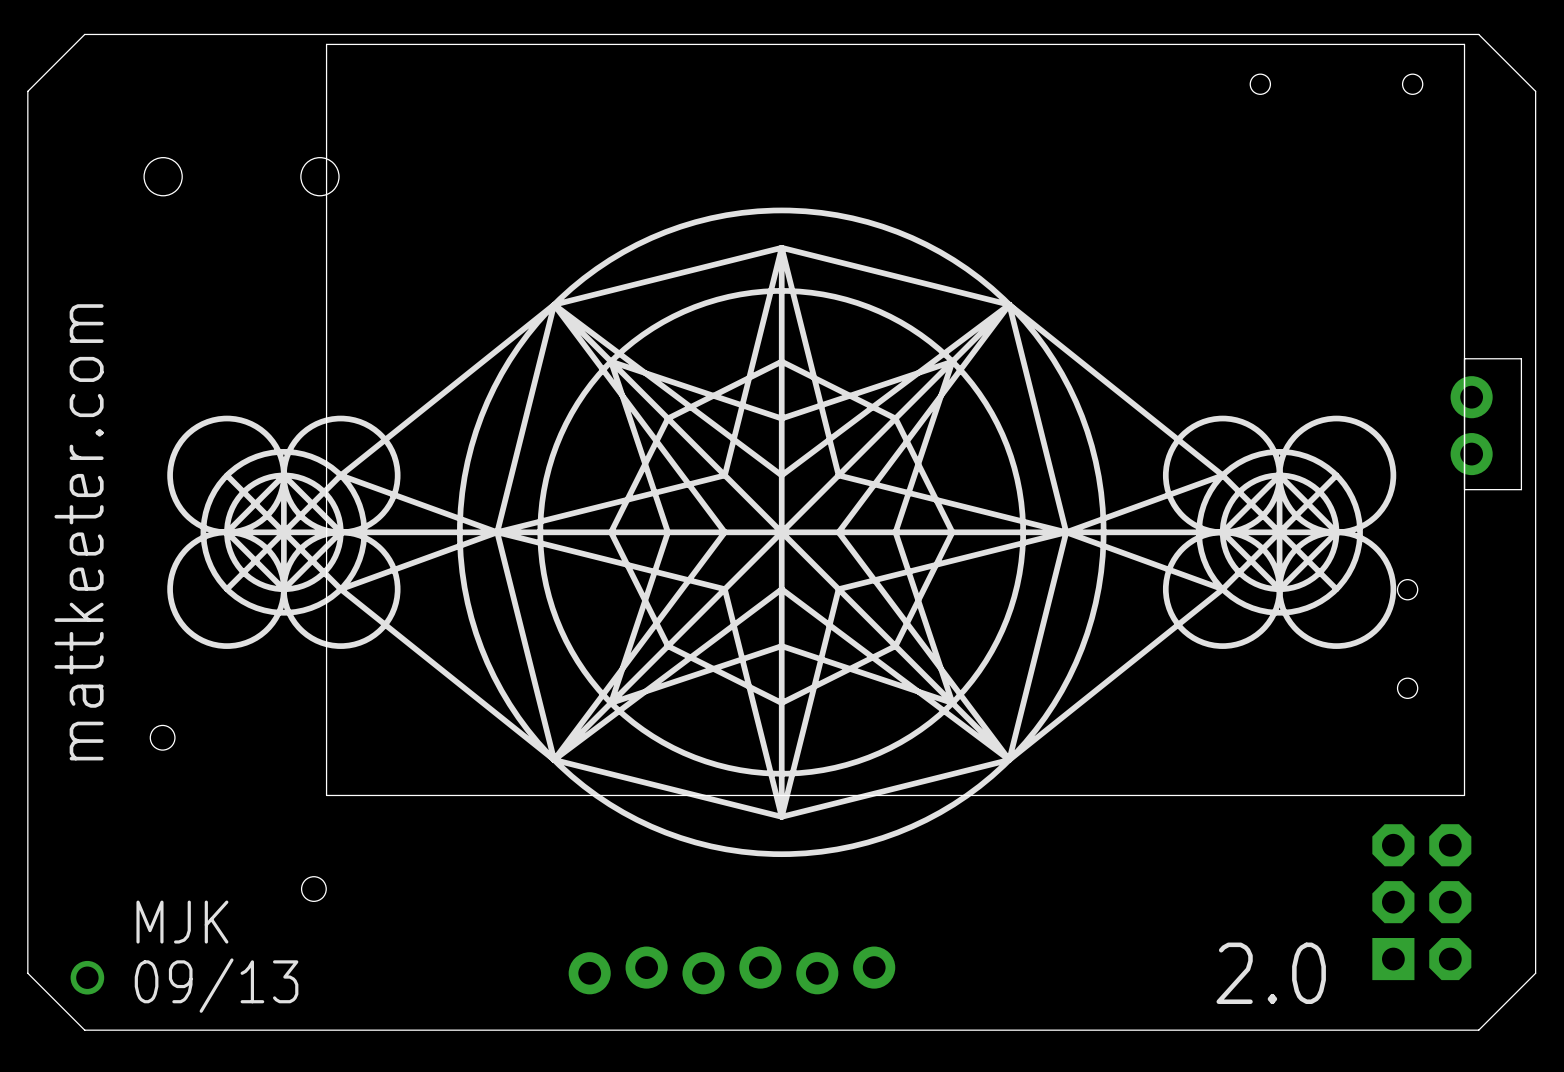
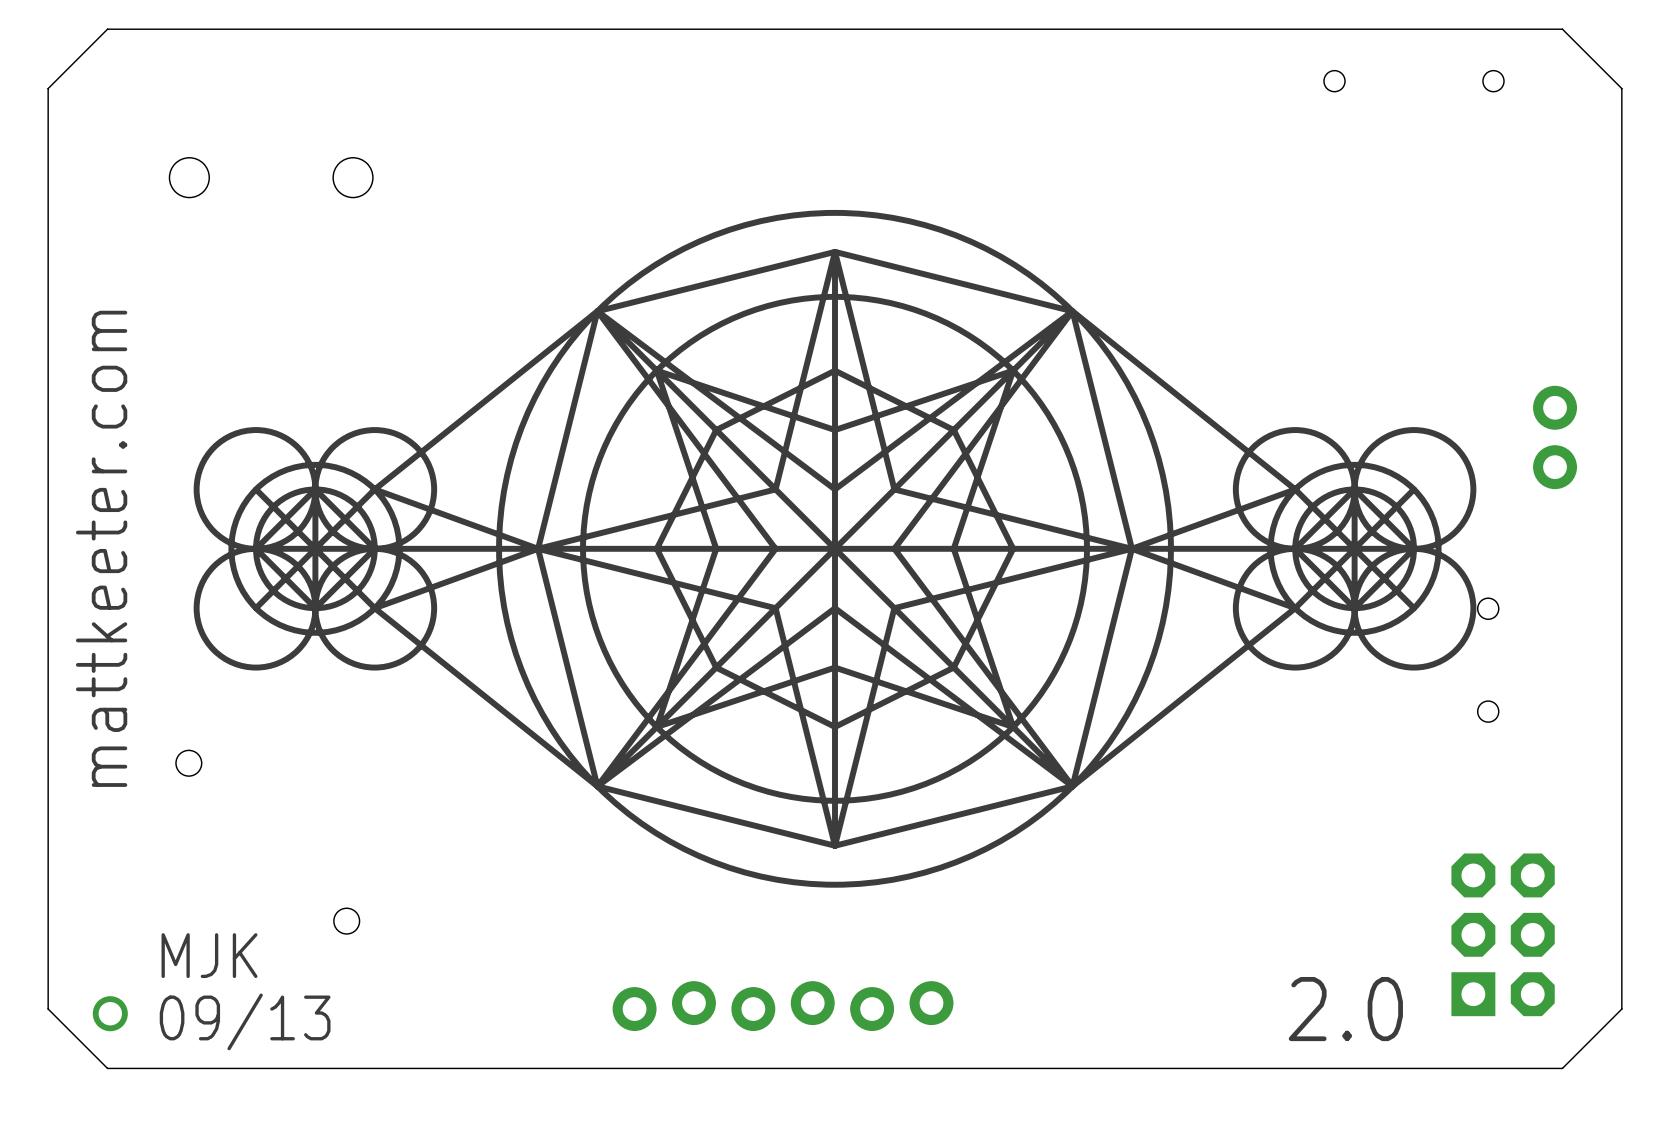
board edge: (1464, 44) (326, 44) (326, 795) (1464, 795) (1464, 44) -> none
board edge: (1464, 358) (1521, 358) (1521, 489) (1464, 489) -> none

